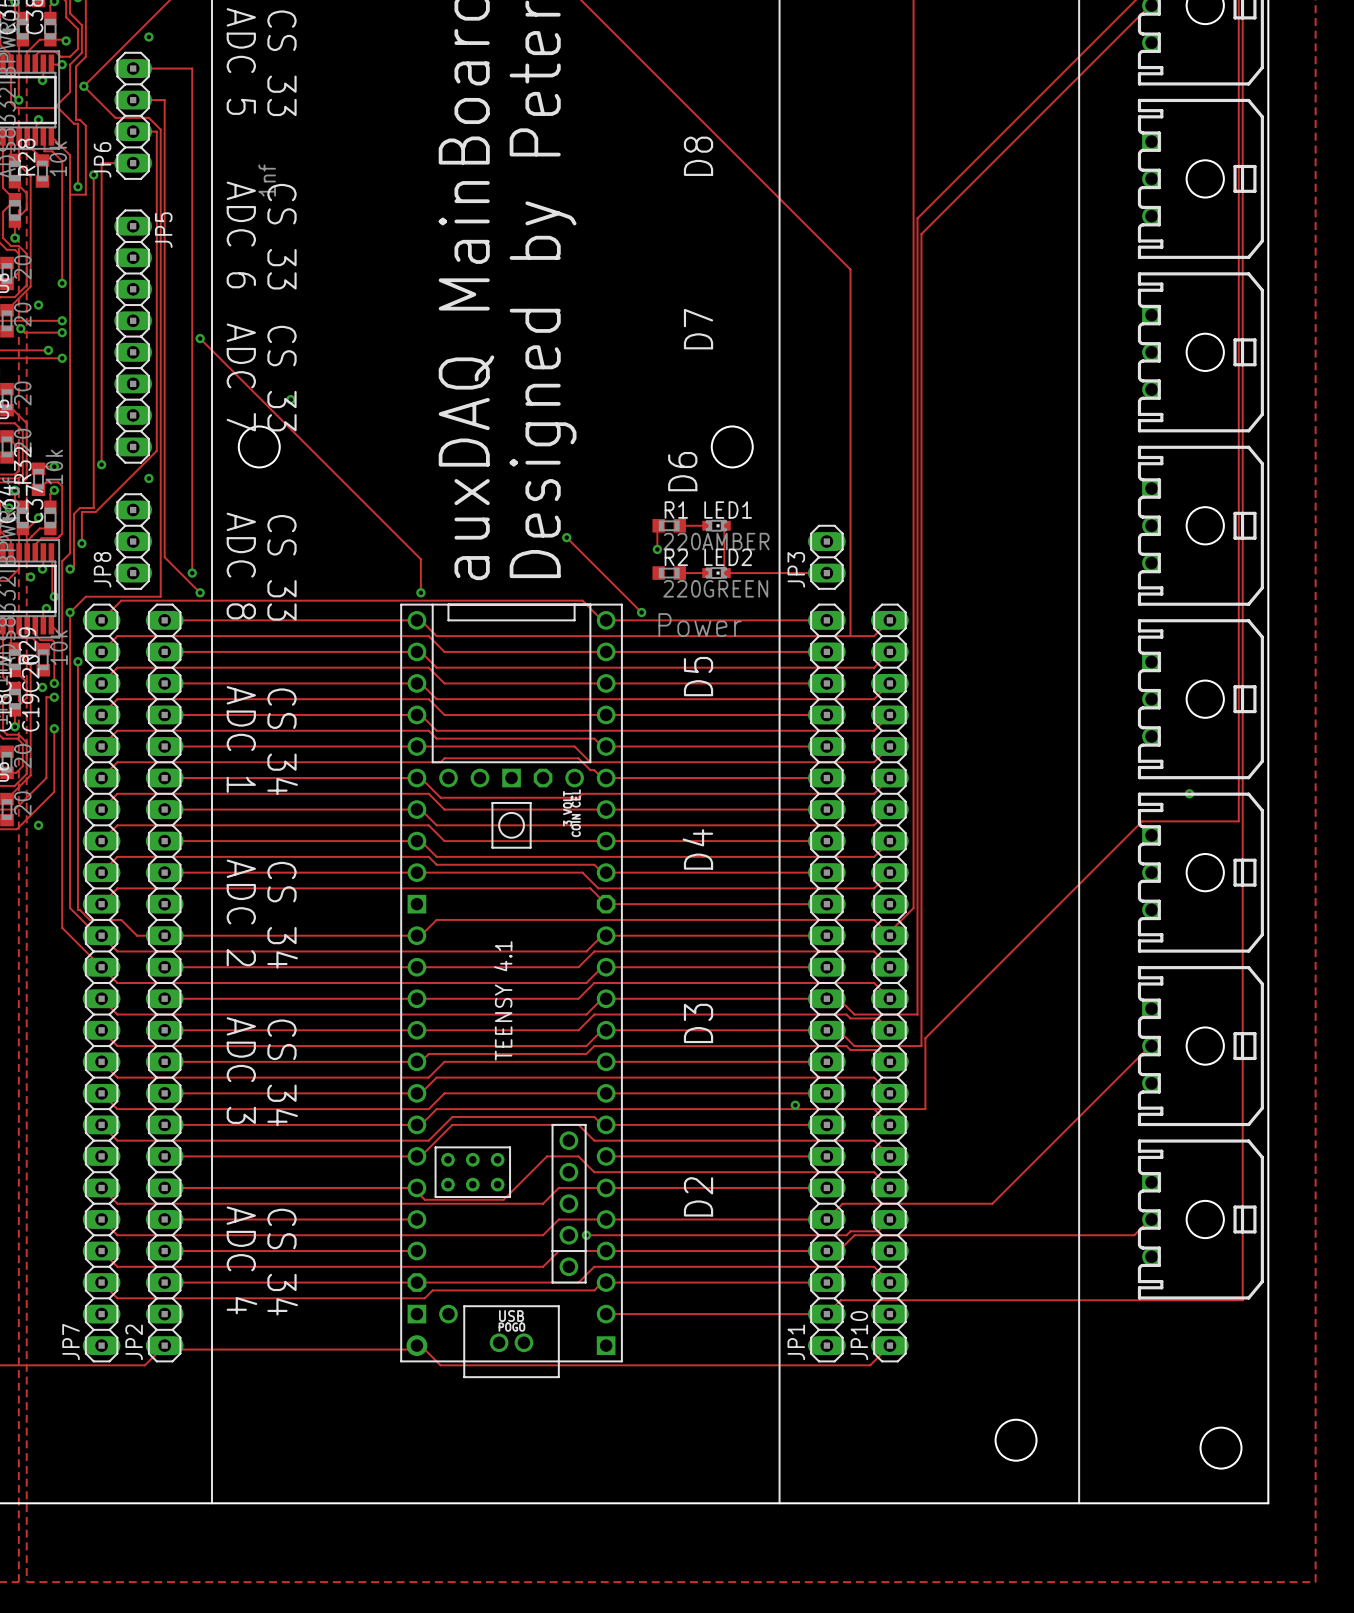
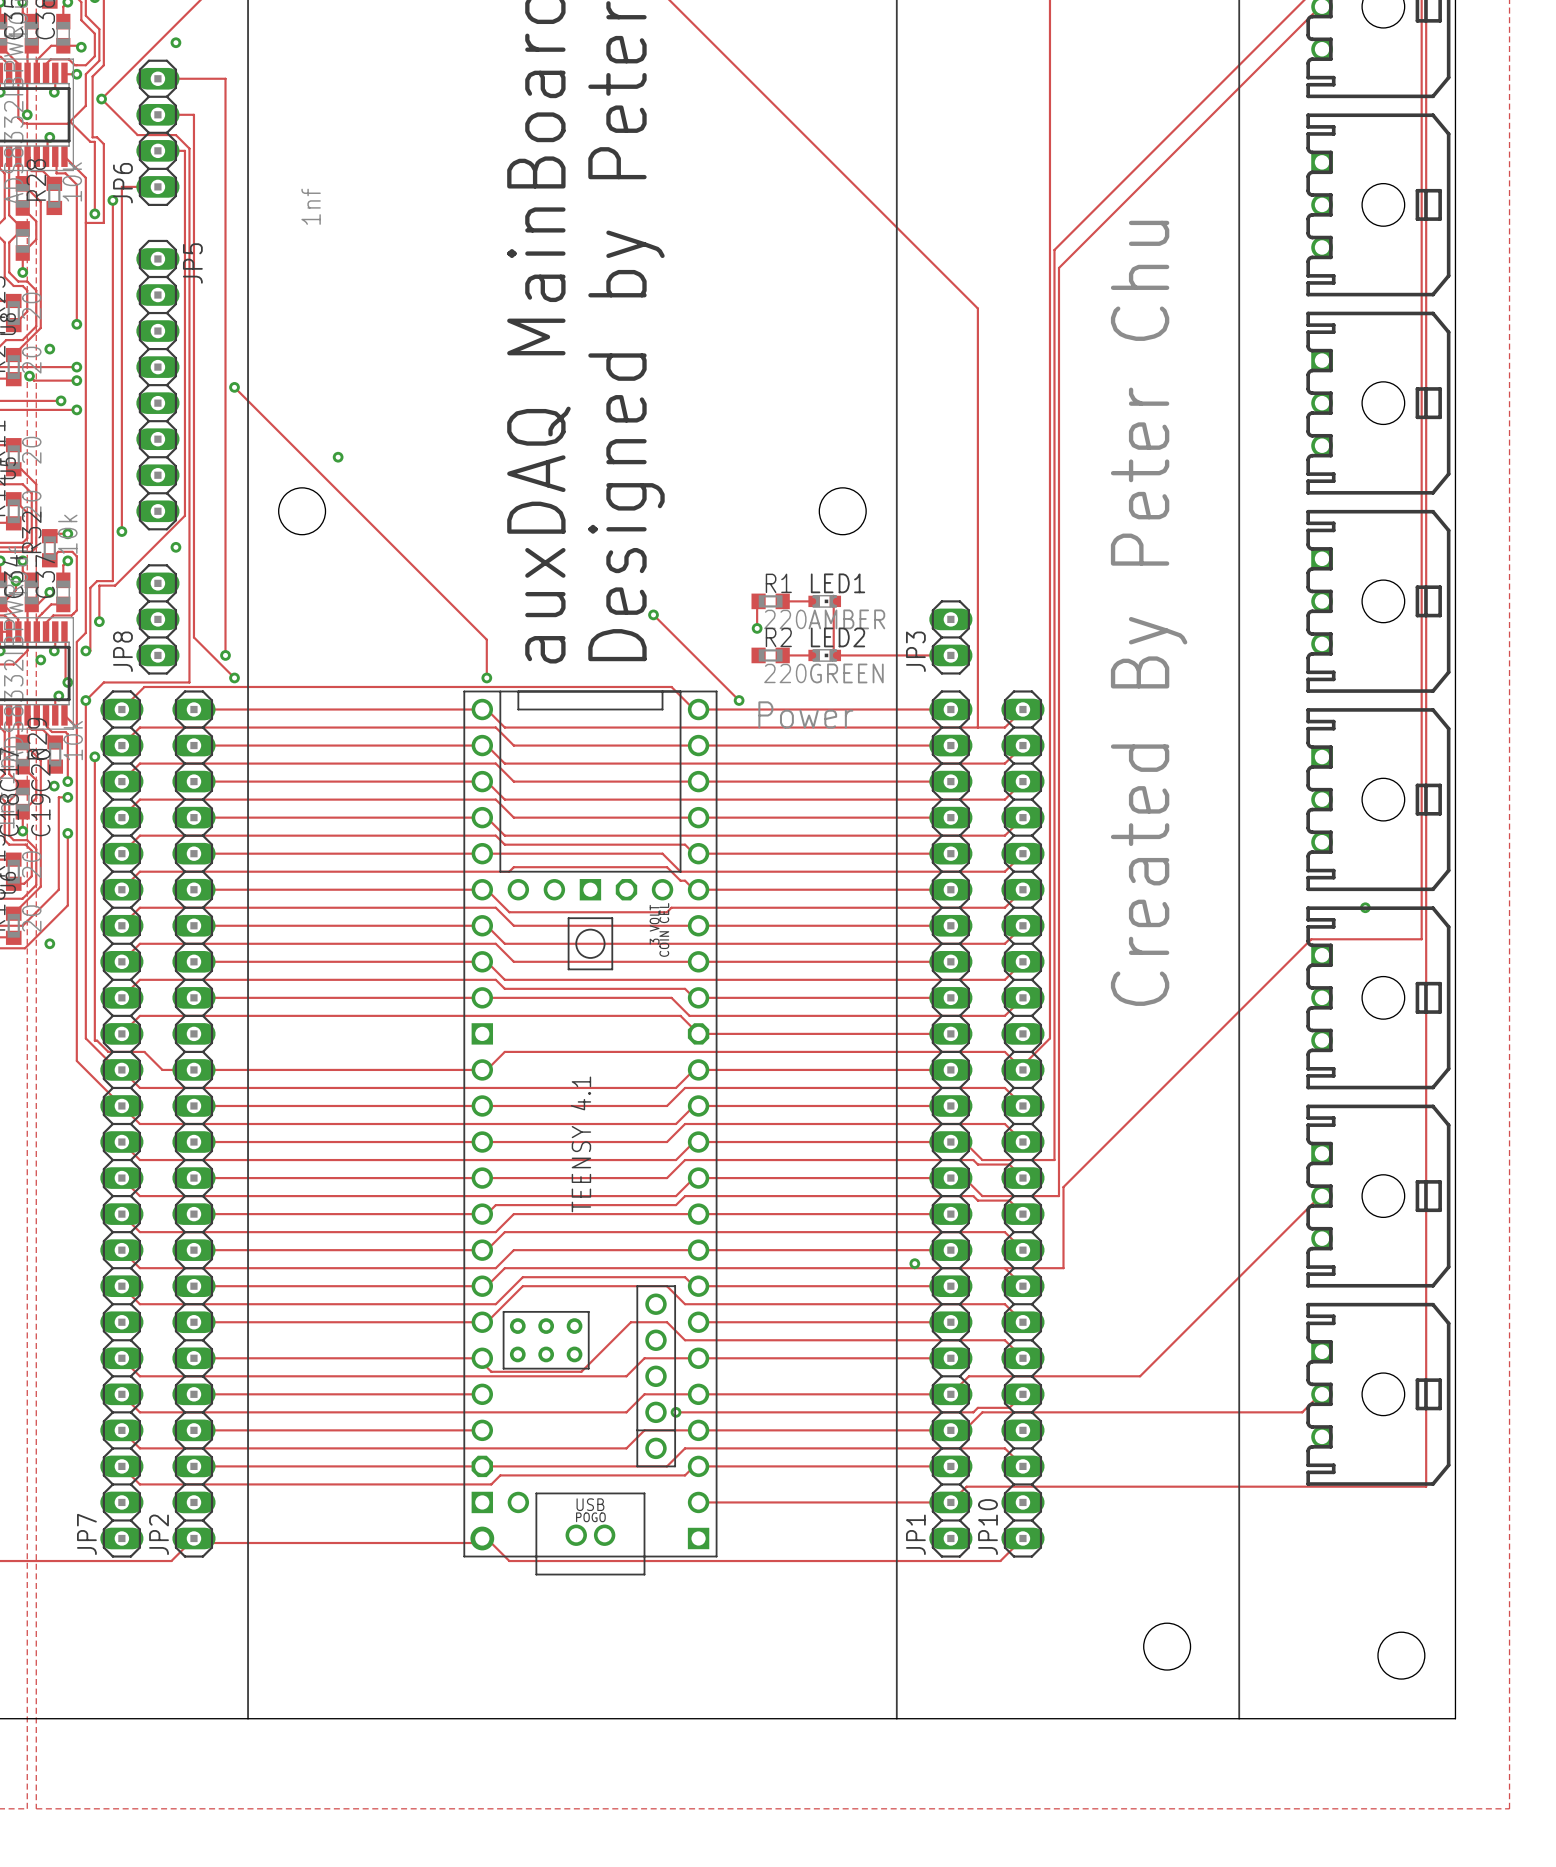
text: ADC 5 (241, 61) -> none
text: CS 33 (281, 63) -> none
text: D8 (698, 156) -> none
text: ADC 6 (241, 234) -> none
text: CS 33 (281, 236) -> none
text: D7 (698, 329) -> none
text: ADC 7 (241, 377) -> none
text: CS 33 (281, 378) -> none
text: D6 (682, 471) -> none
text: none -> Created By Peter Chu (1149, 613)
text: ADC 8 (241, 566) -> none
text: CS 33 (281, 567) -> none
text: D5 (698, 676) -> none
text: ADC 1 (241, 739) -> none
text: CS 34 (282, 741) -> none
text: D4 (697, 849) -> none
text: ADC 2 (241, 912) -> none
text: CS 34 (282, 915) -> none
text: D3 (698, 1023) -> none
text: ADC 3 (241, 1070) -> none
text: CS 34 (282, 1072) -> none
text: D2 (698, 1196) -> none
text: ADC 4 (241, 1260) -> none
text: CS 34 (282, 1262) -> none

